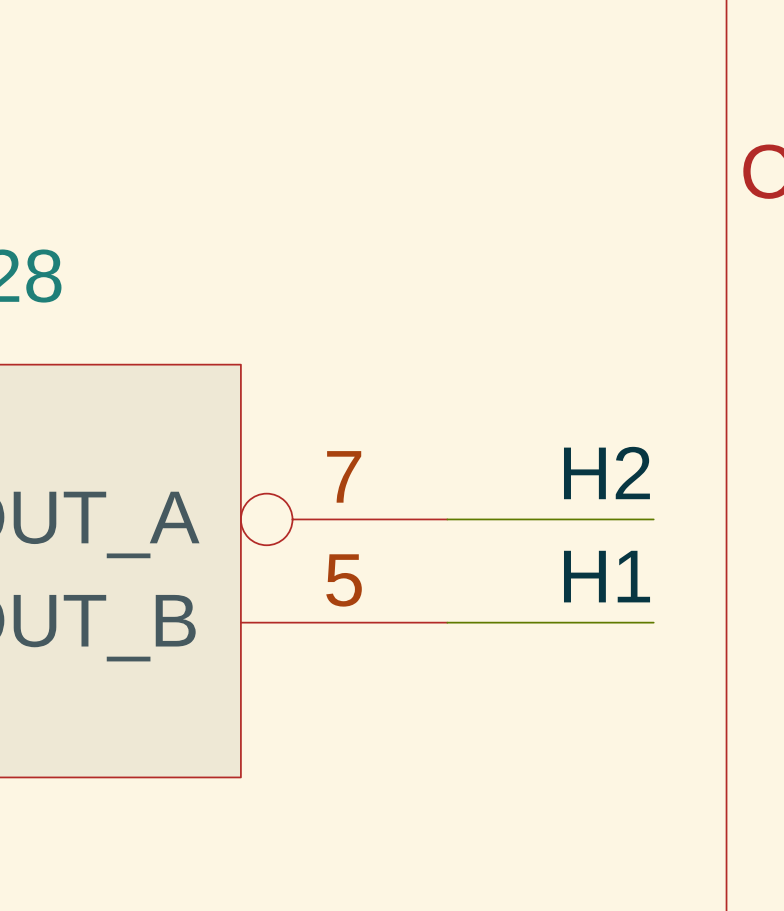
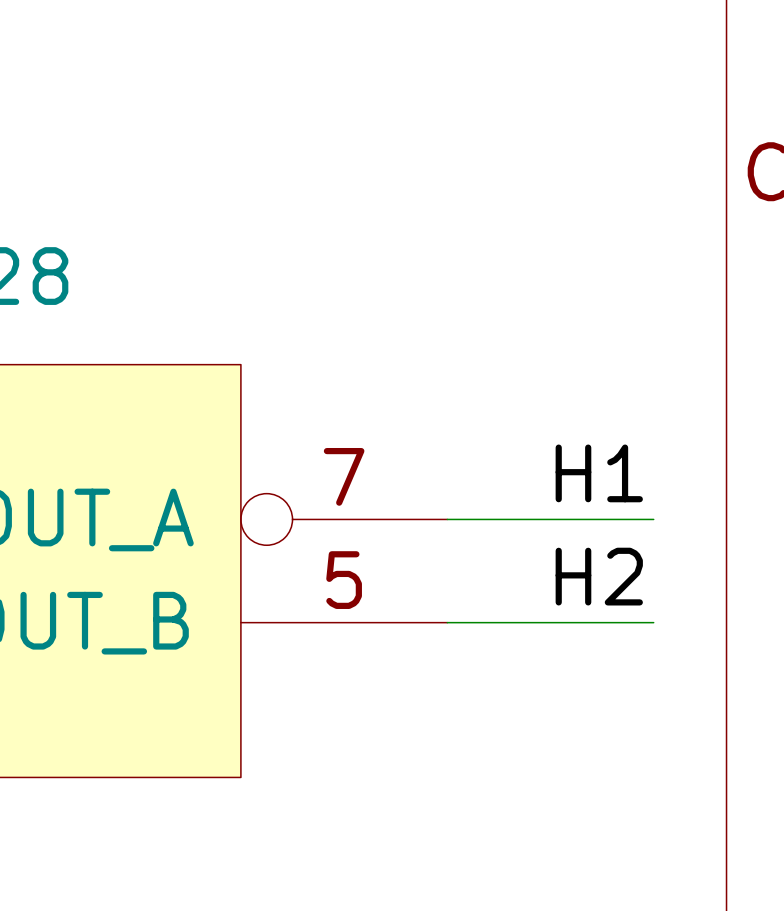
label: H2 (606, 473) -> H1 (599, 473)
label: H1 (607, 576) -> H2 (599, 576)

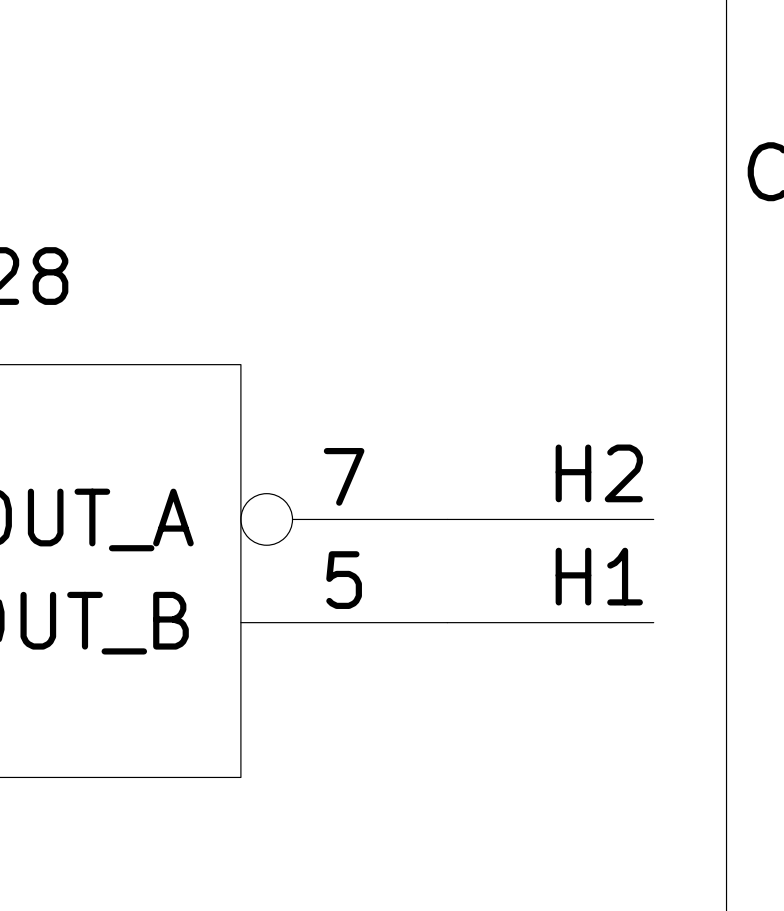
label: H1 (599, 473) -> H2 (599, 473)
label: H2 (599, 576) -> H1 (599, 576)

